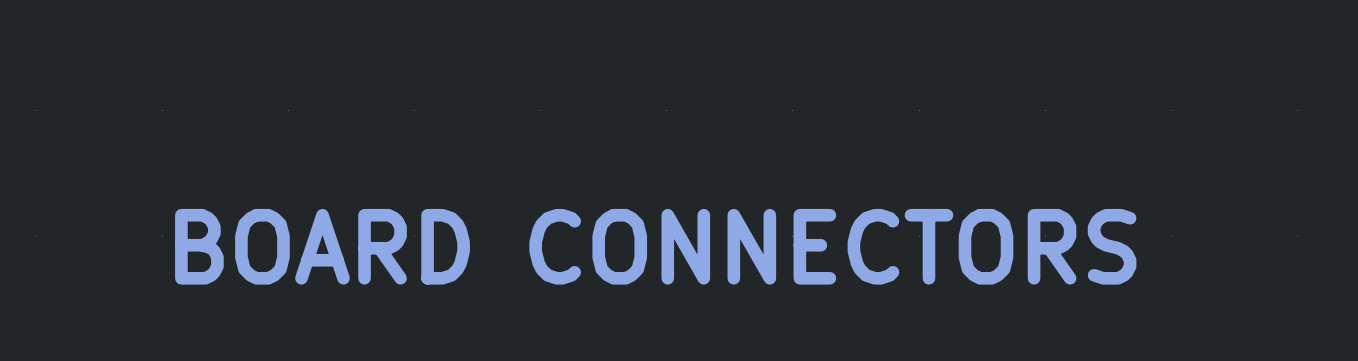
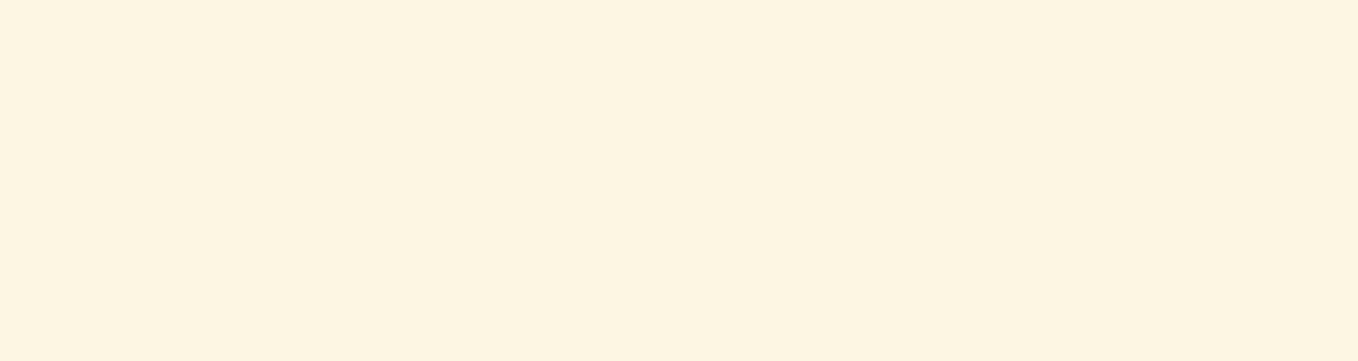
text: BOARD CONNECTORS (655, 246) -> none

